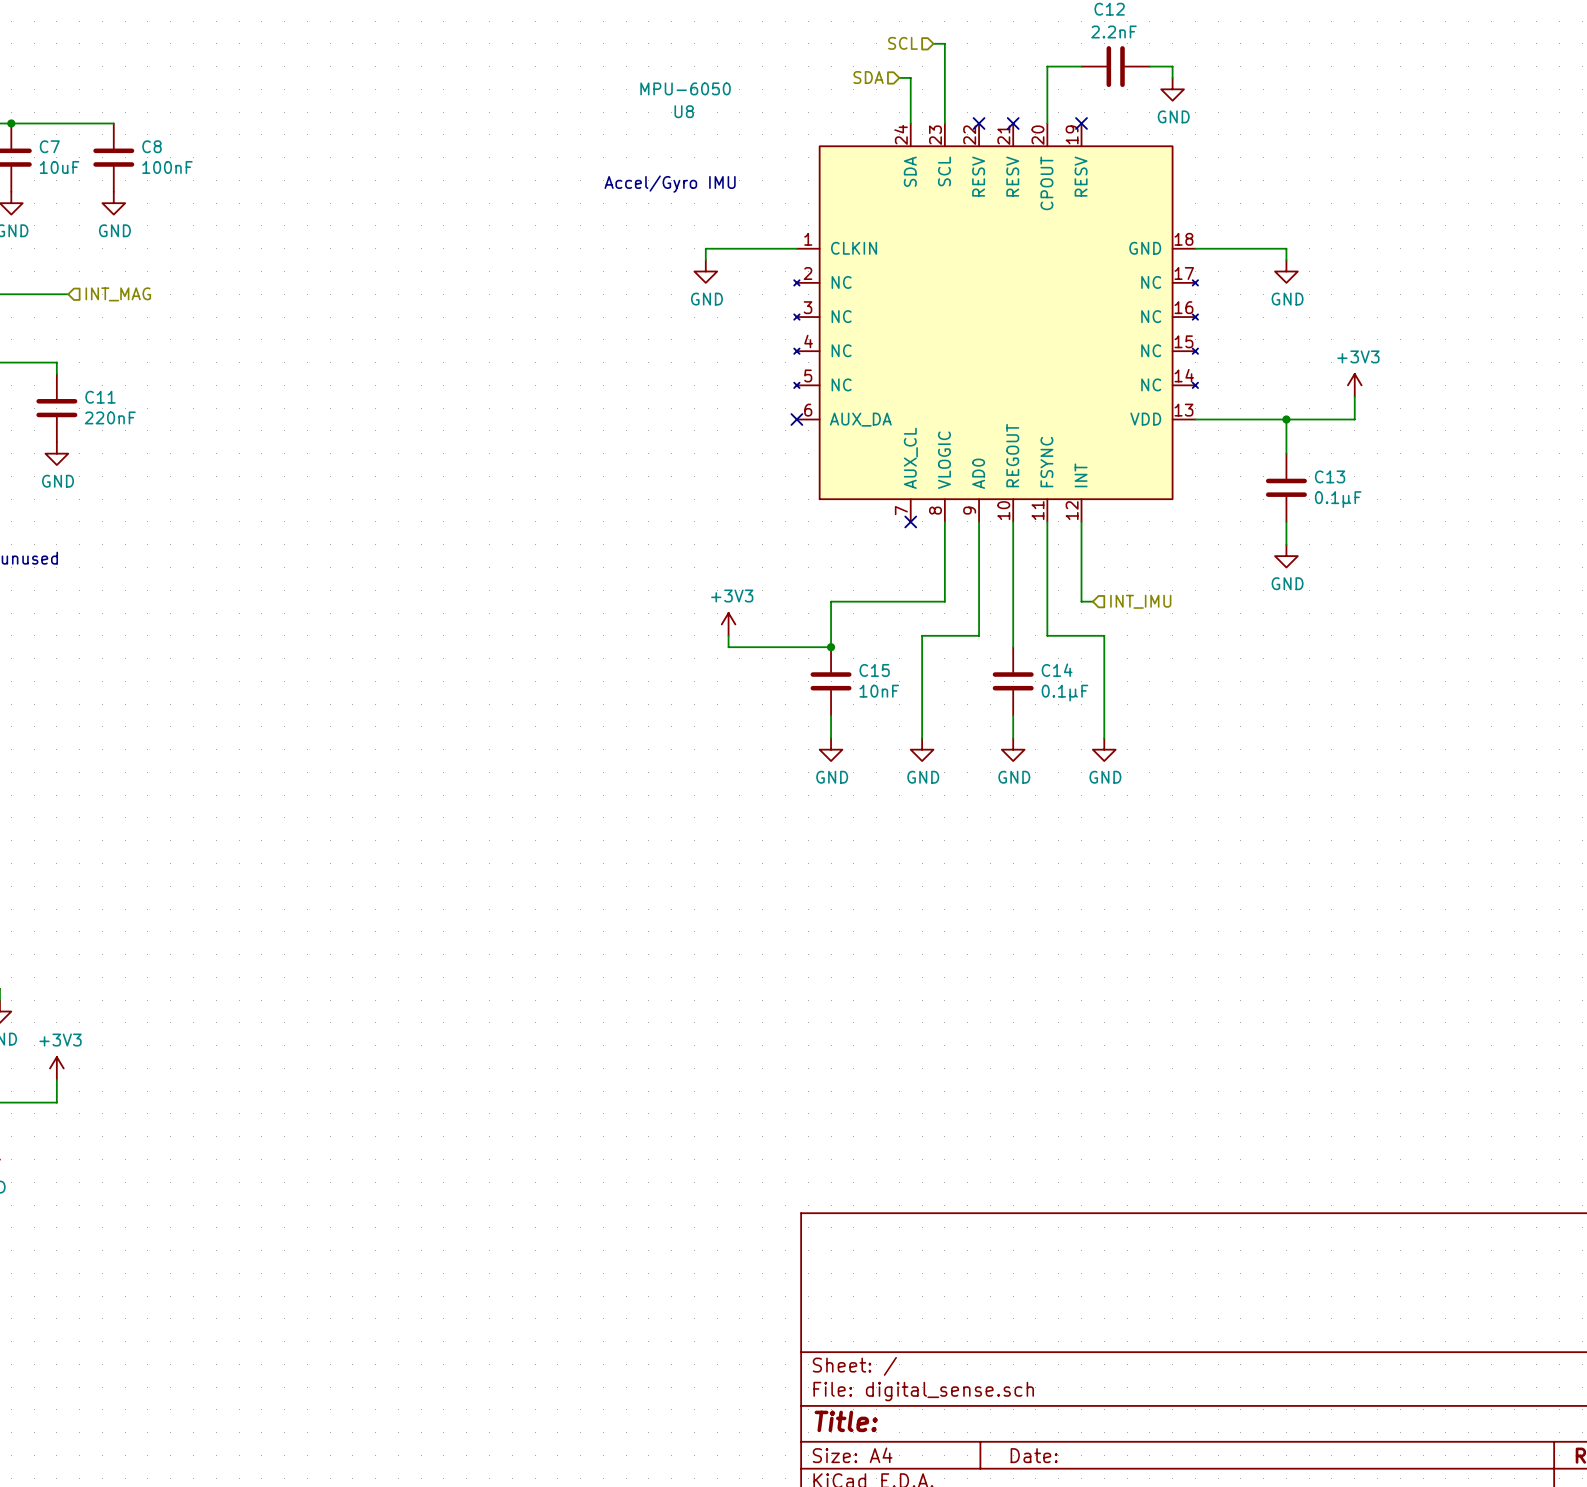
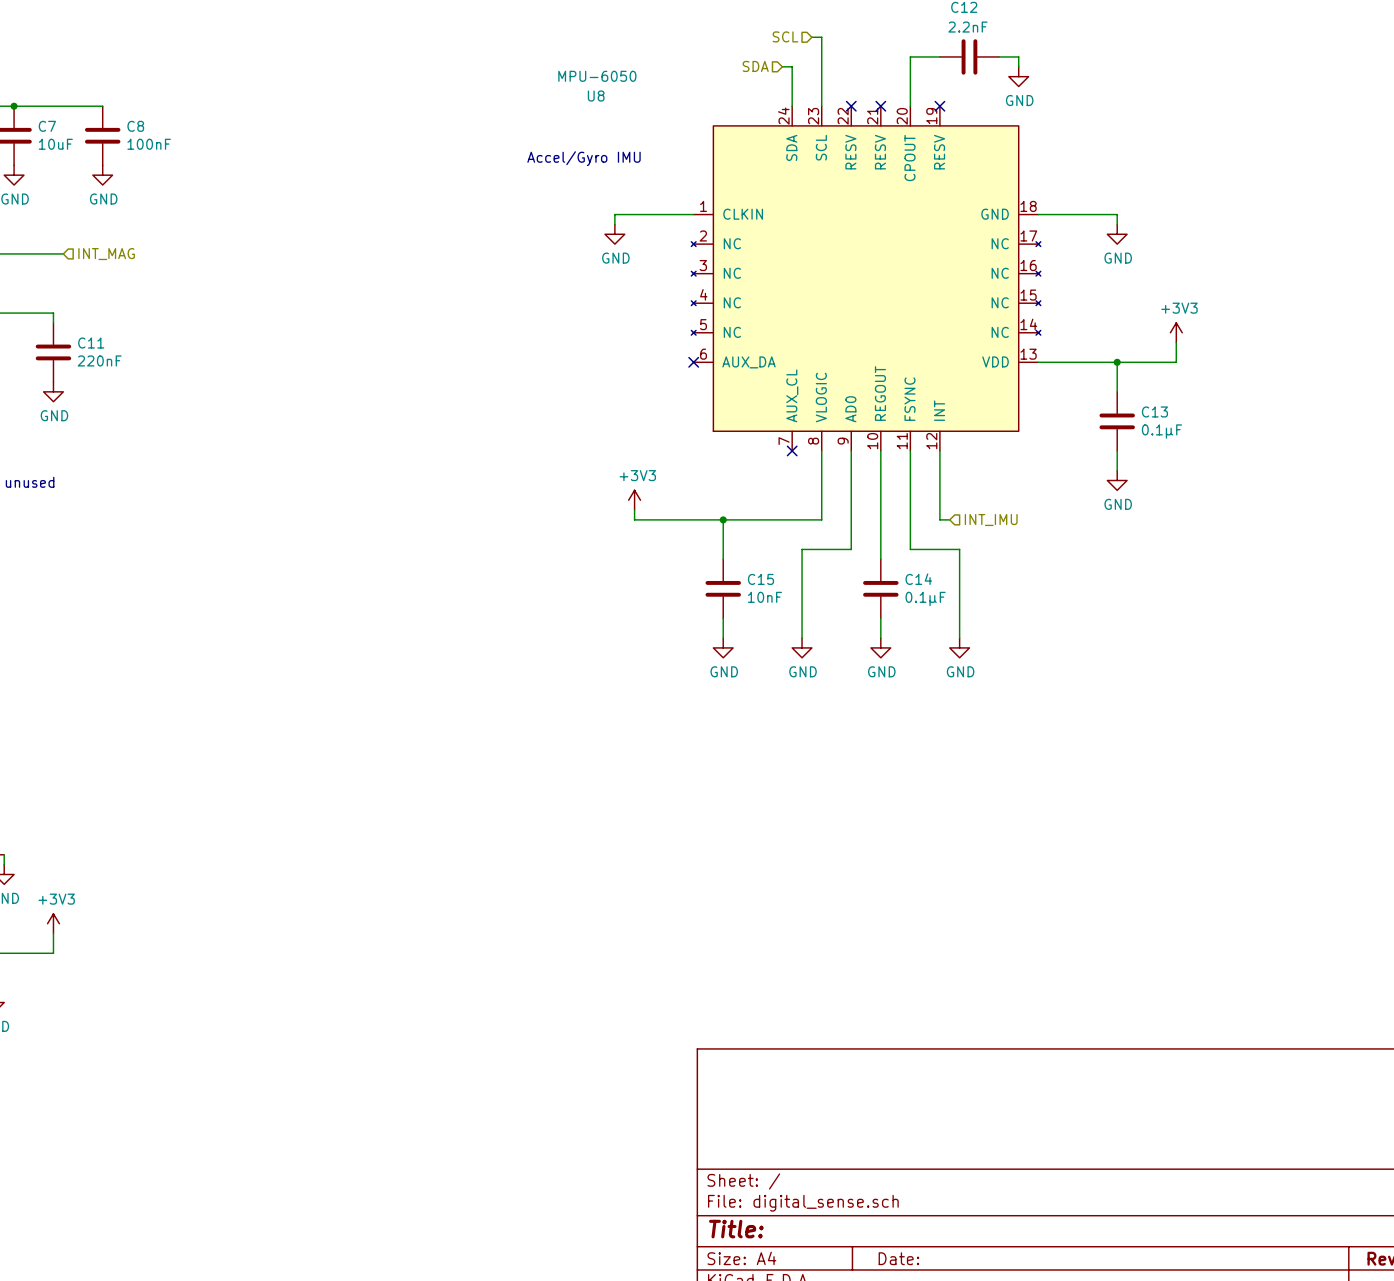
power symbol position: +3V3 (728, 624) -> +3V3 (634, 500)
wire: (728, 635) (728, 647) (831, 647) -> (634, 510) (634, 519) (723, 519)
junction position: (831, 647) -> (723, 519)

